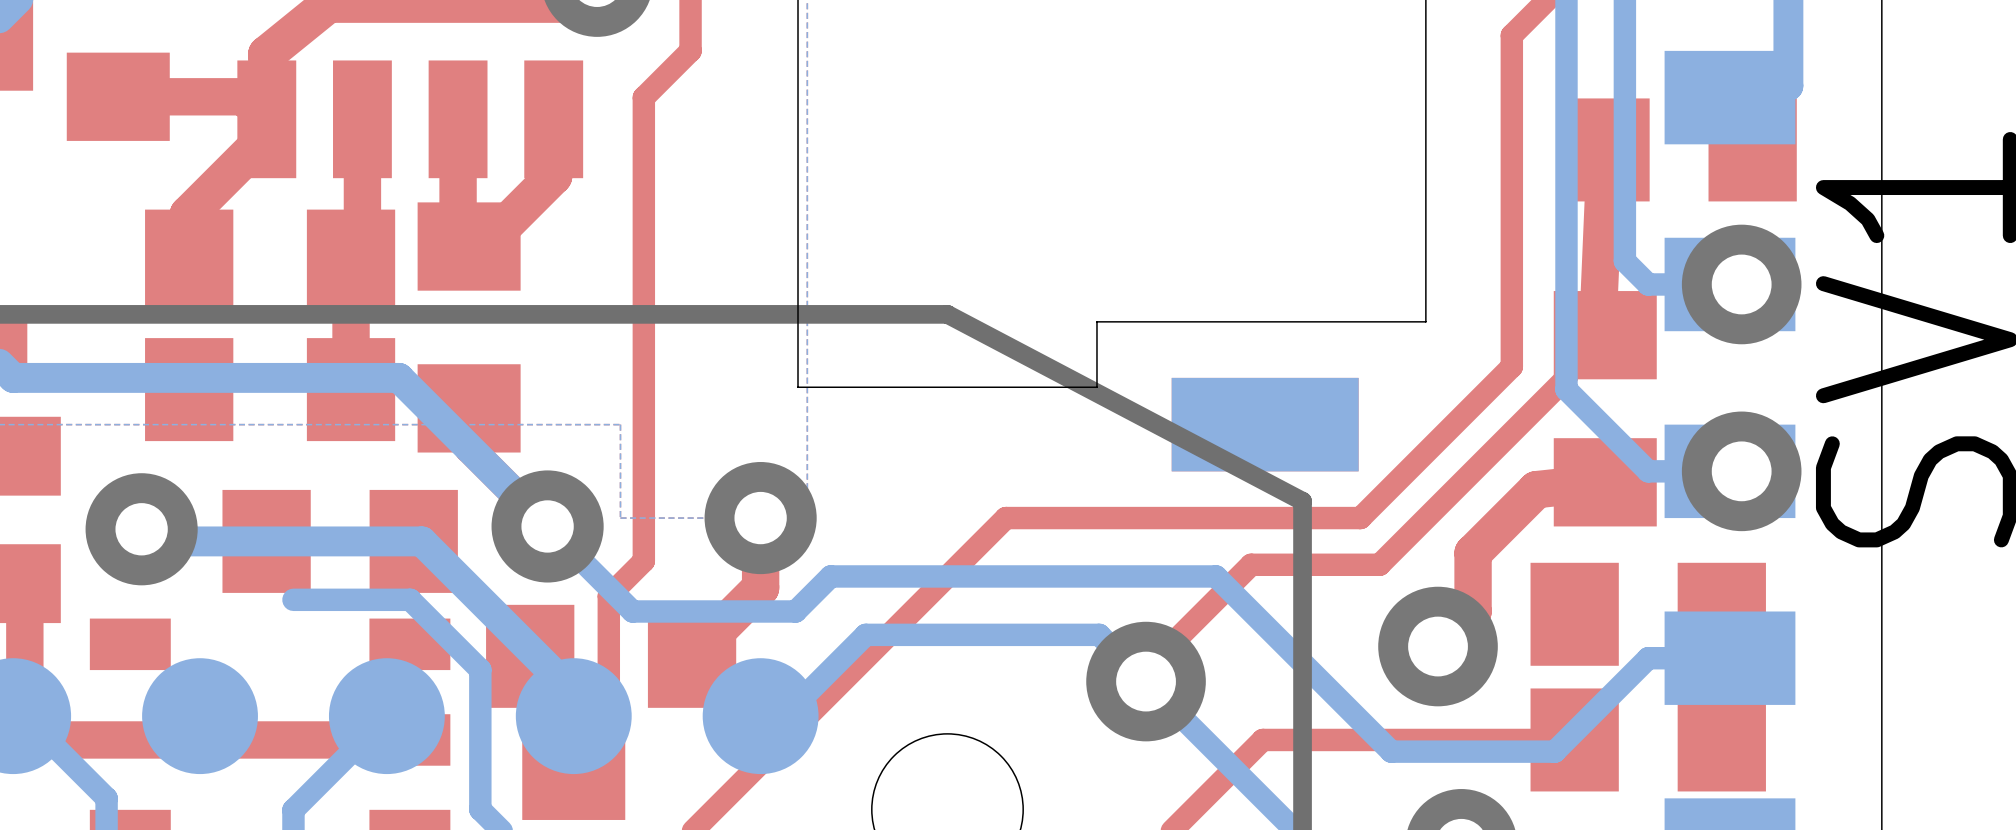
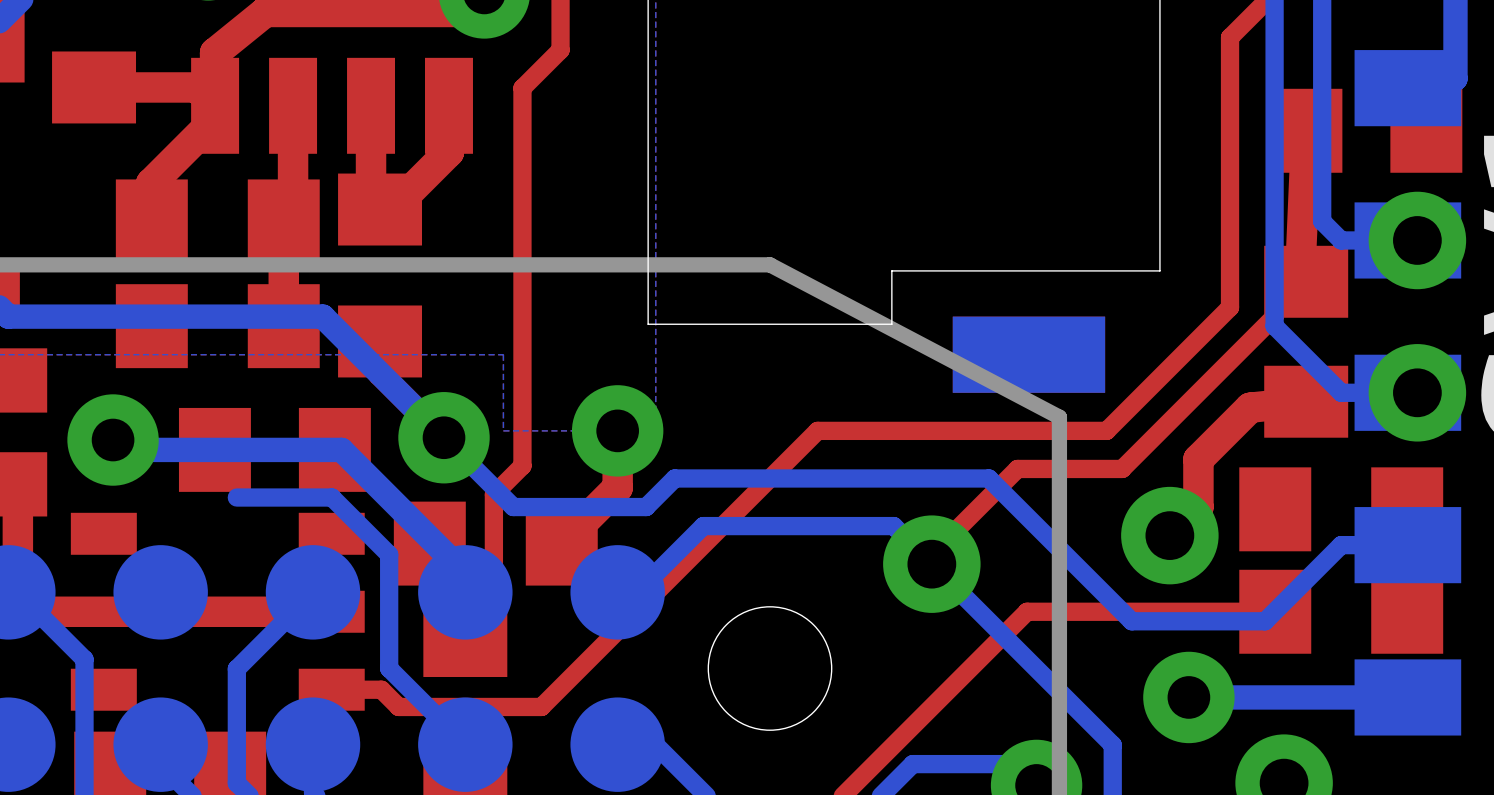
part footprint: [1530, 562, 1766, 666] -> [1239, 467, 1444, 552]
part footprint: [1530, 688, 1766, 792] -> [1239, 569, 1444, 654]

